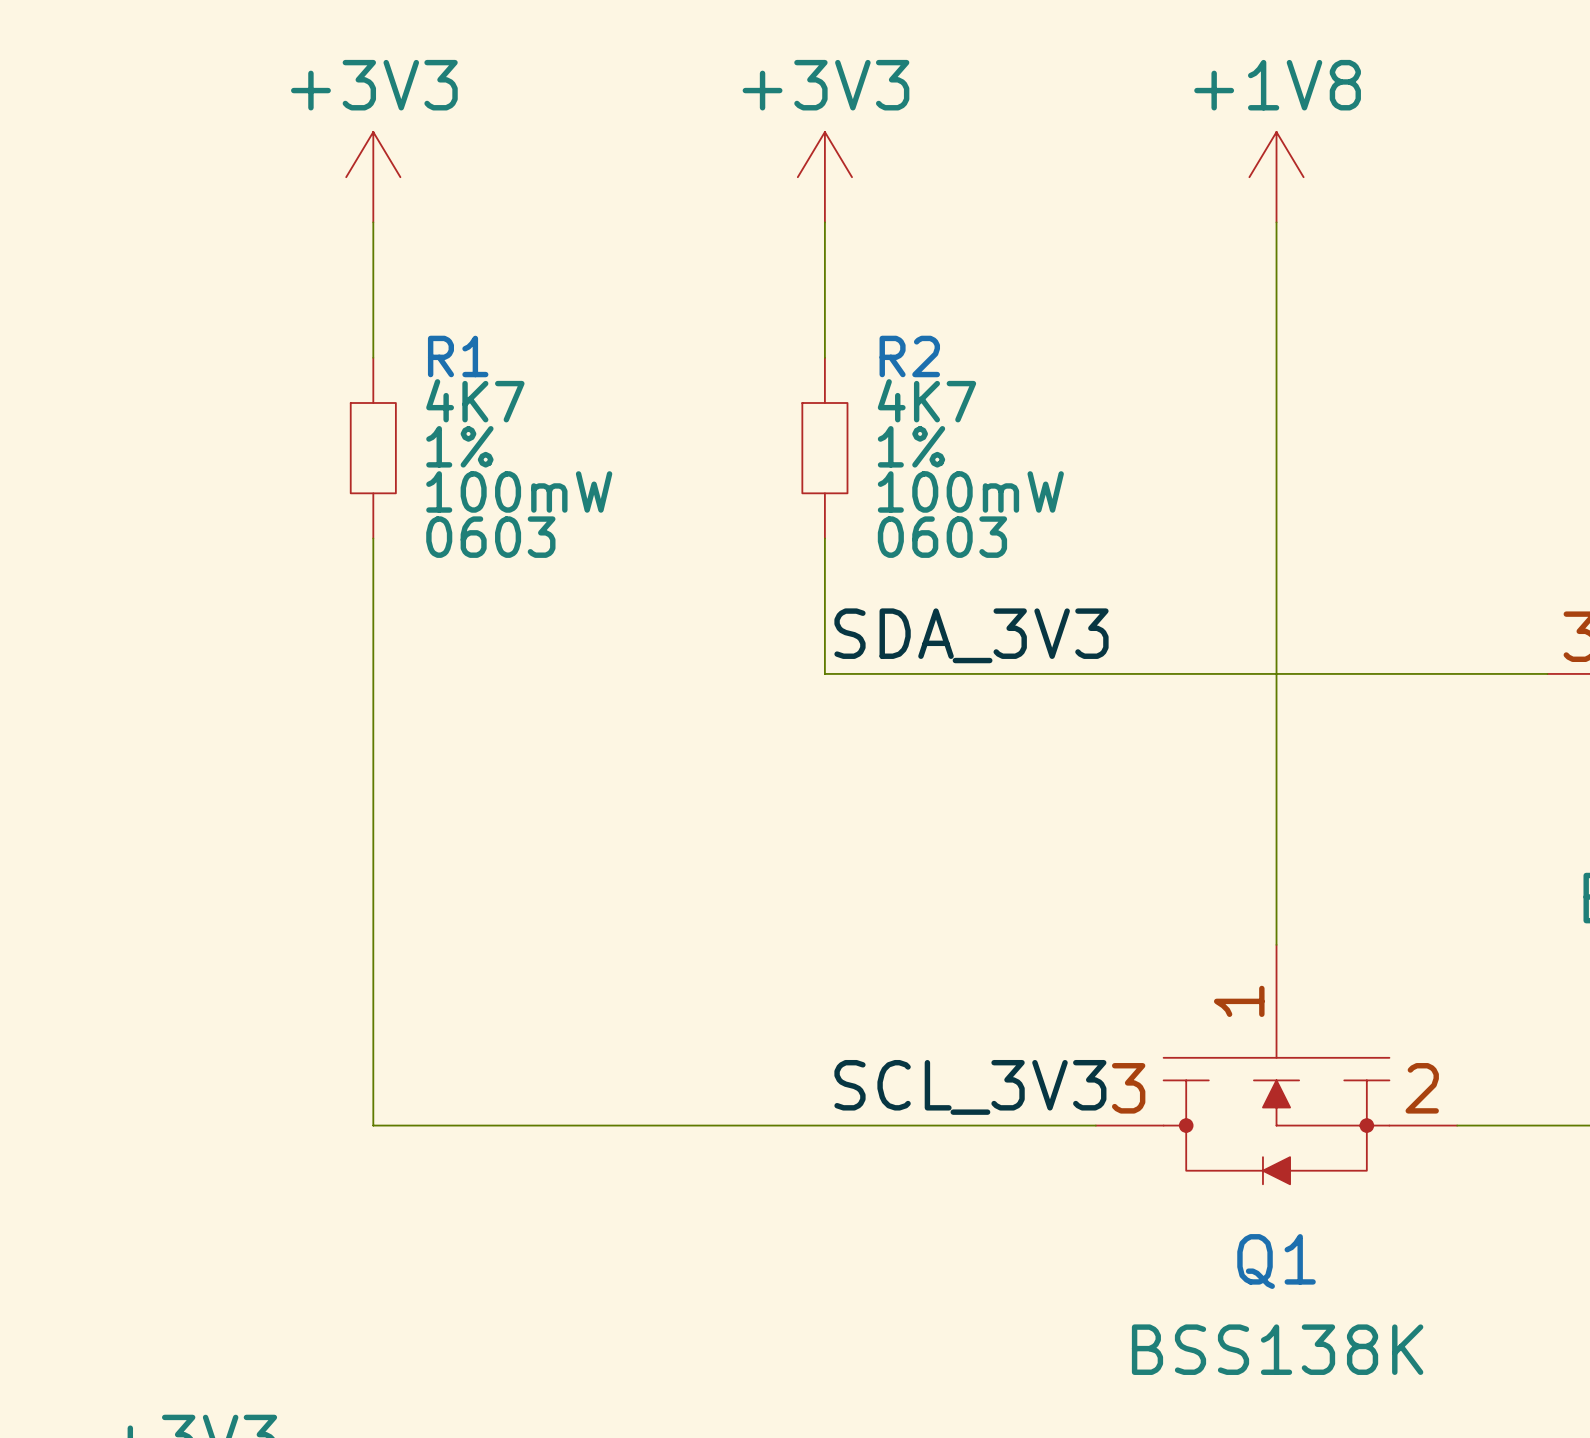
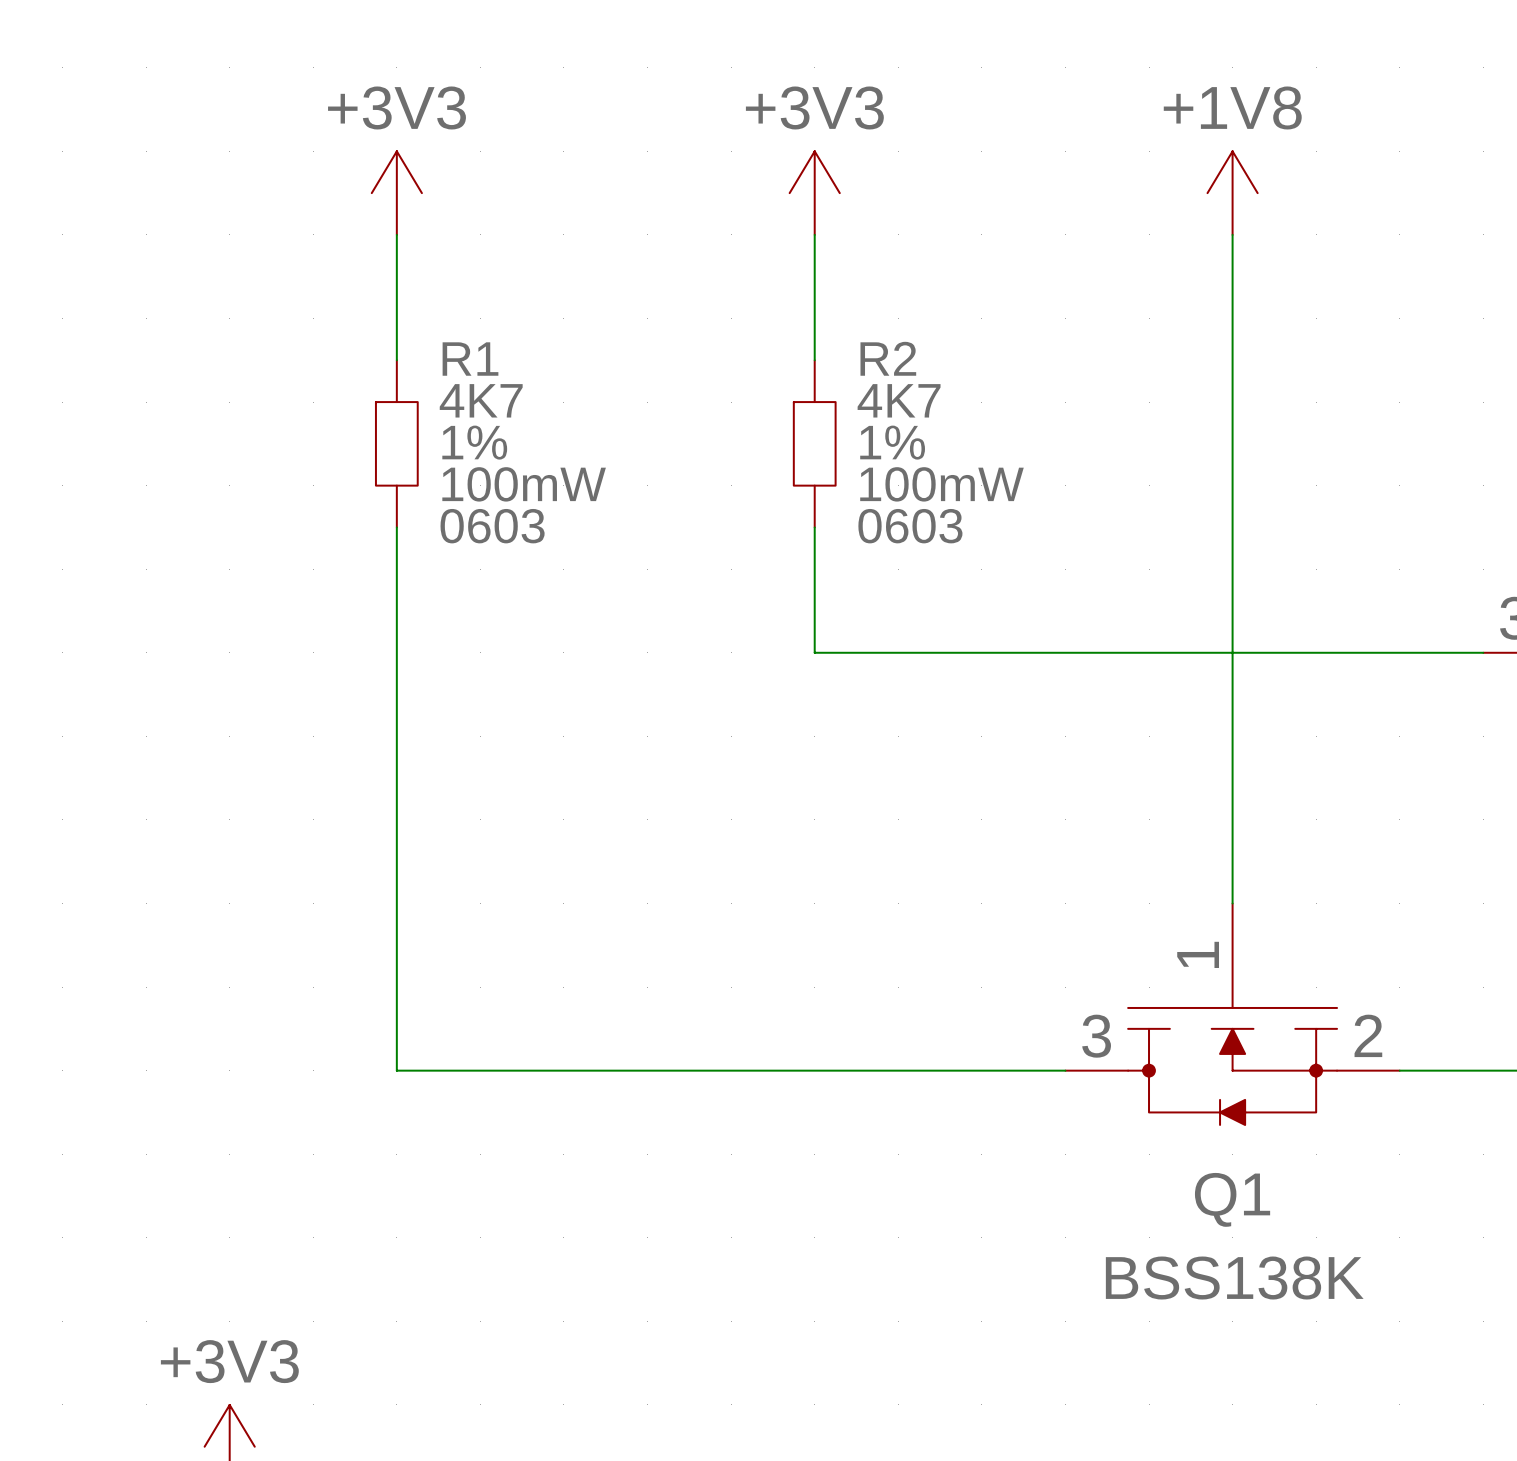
label: SDA_3V3 (971, 635) -> none
label: SCL_3V3 (970, 1087) -> none

